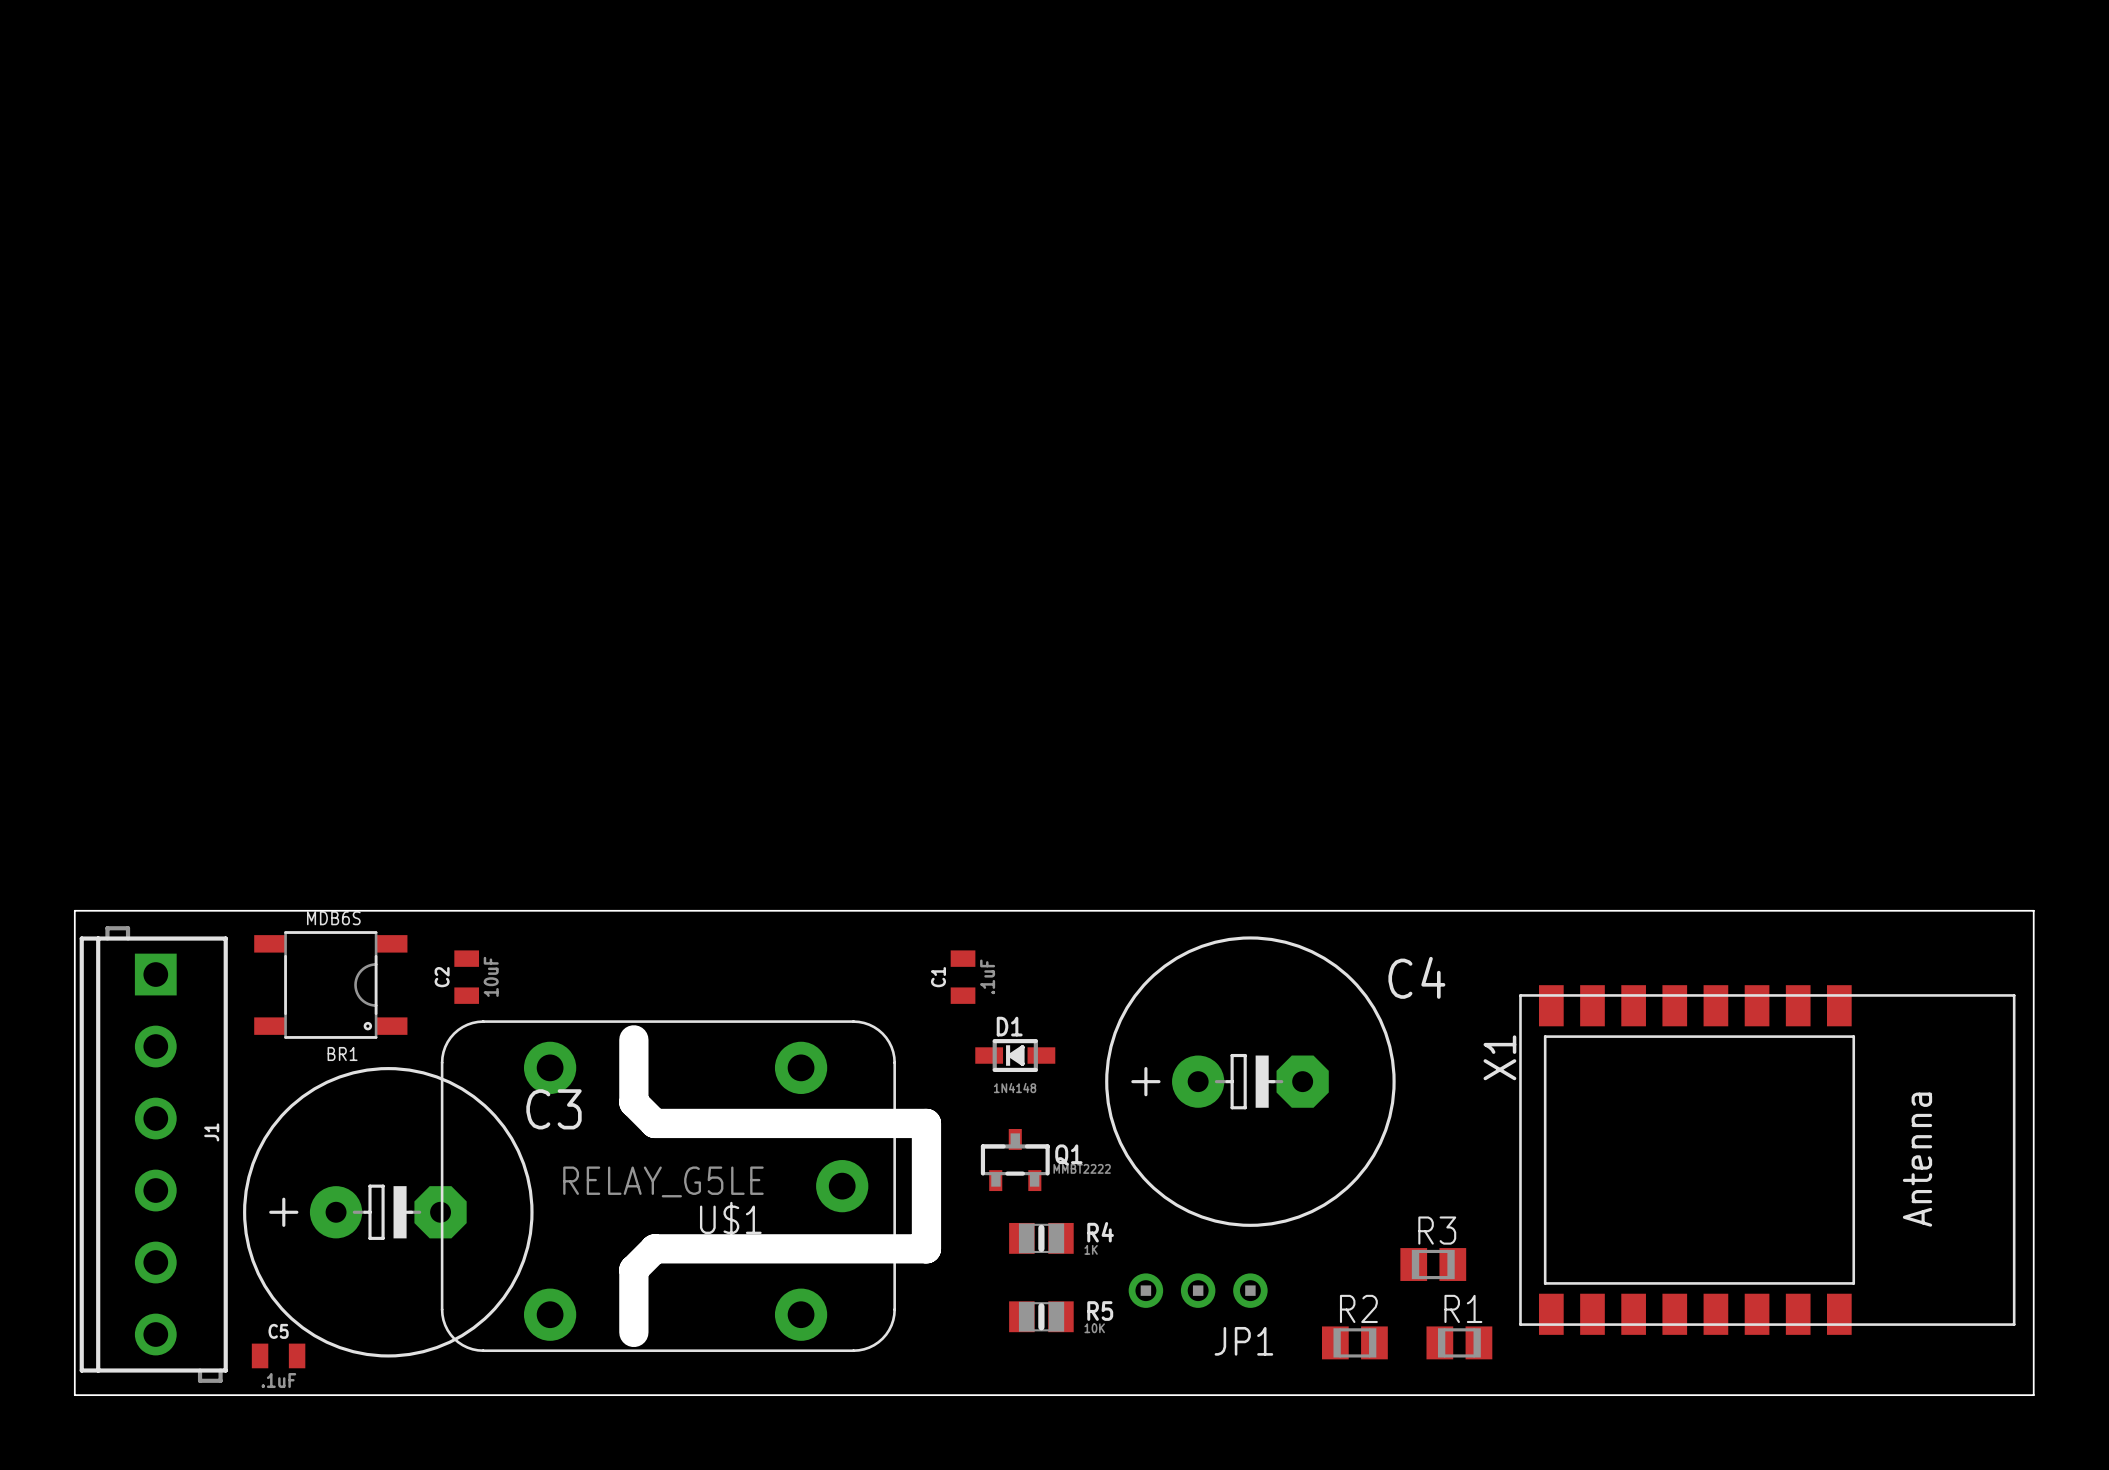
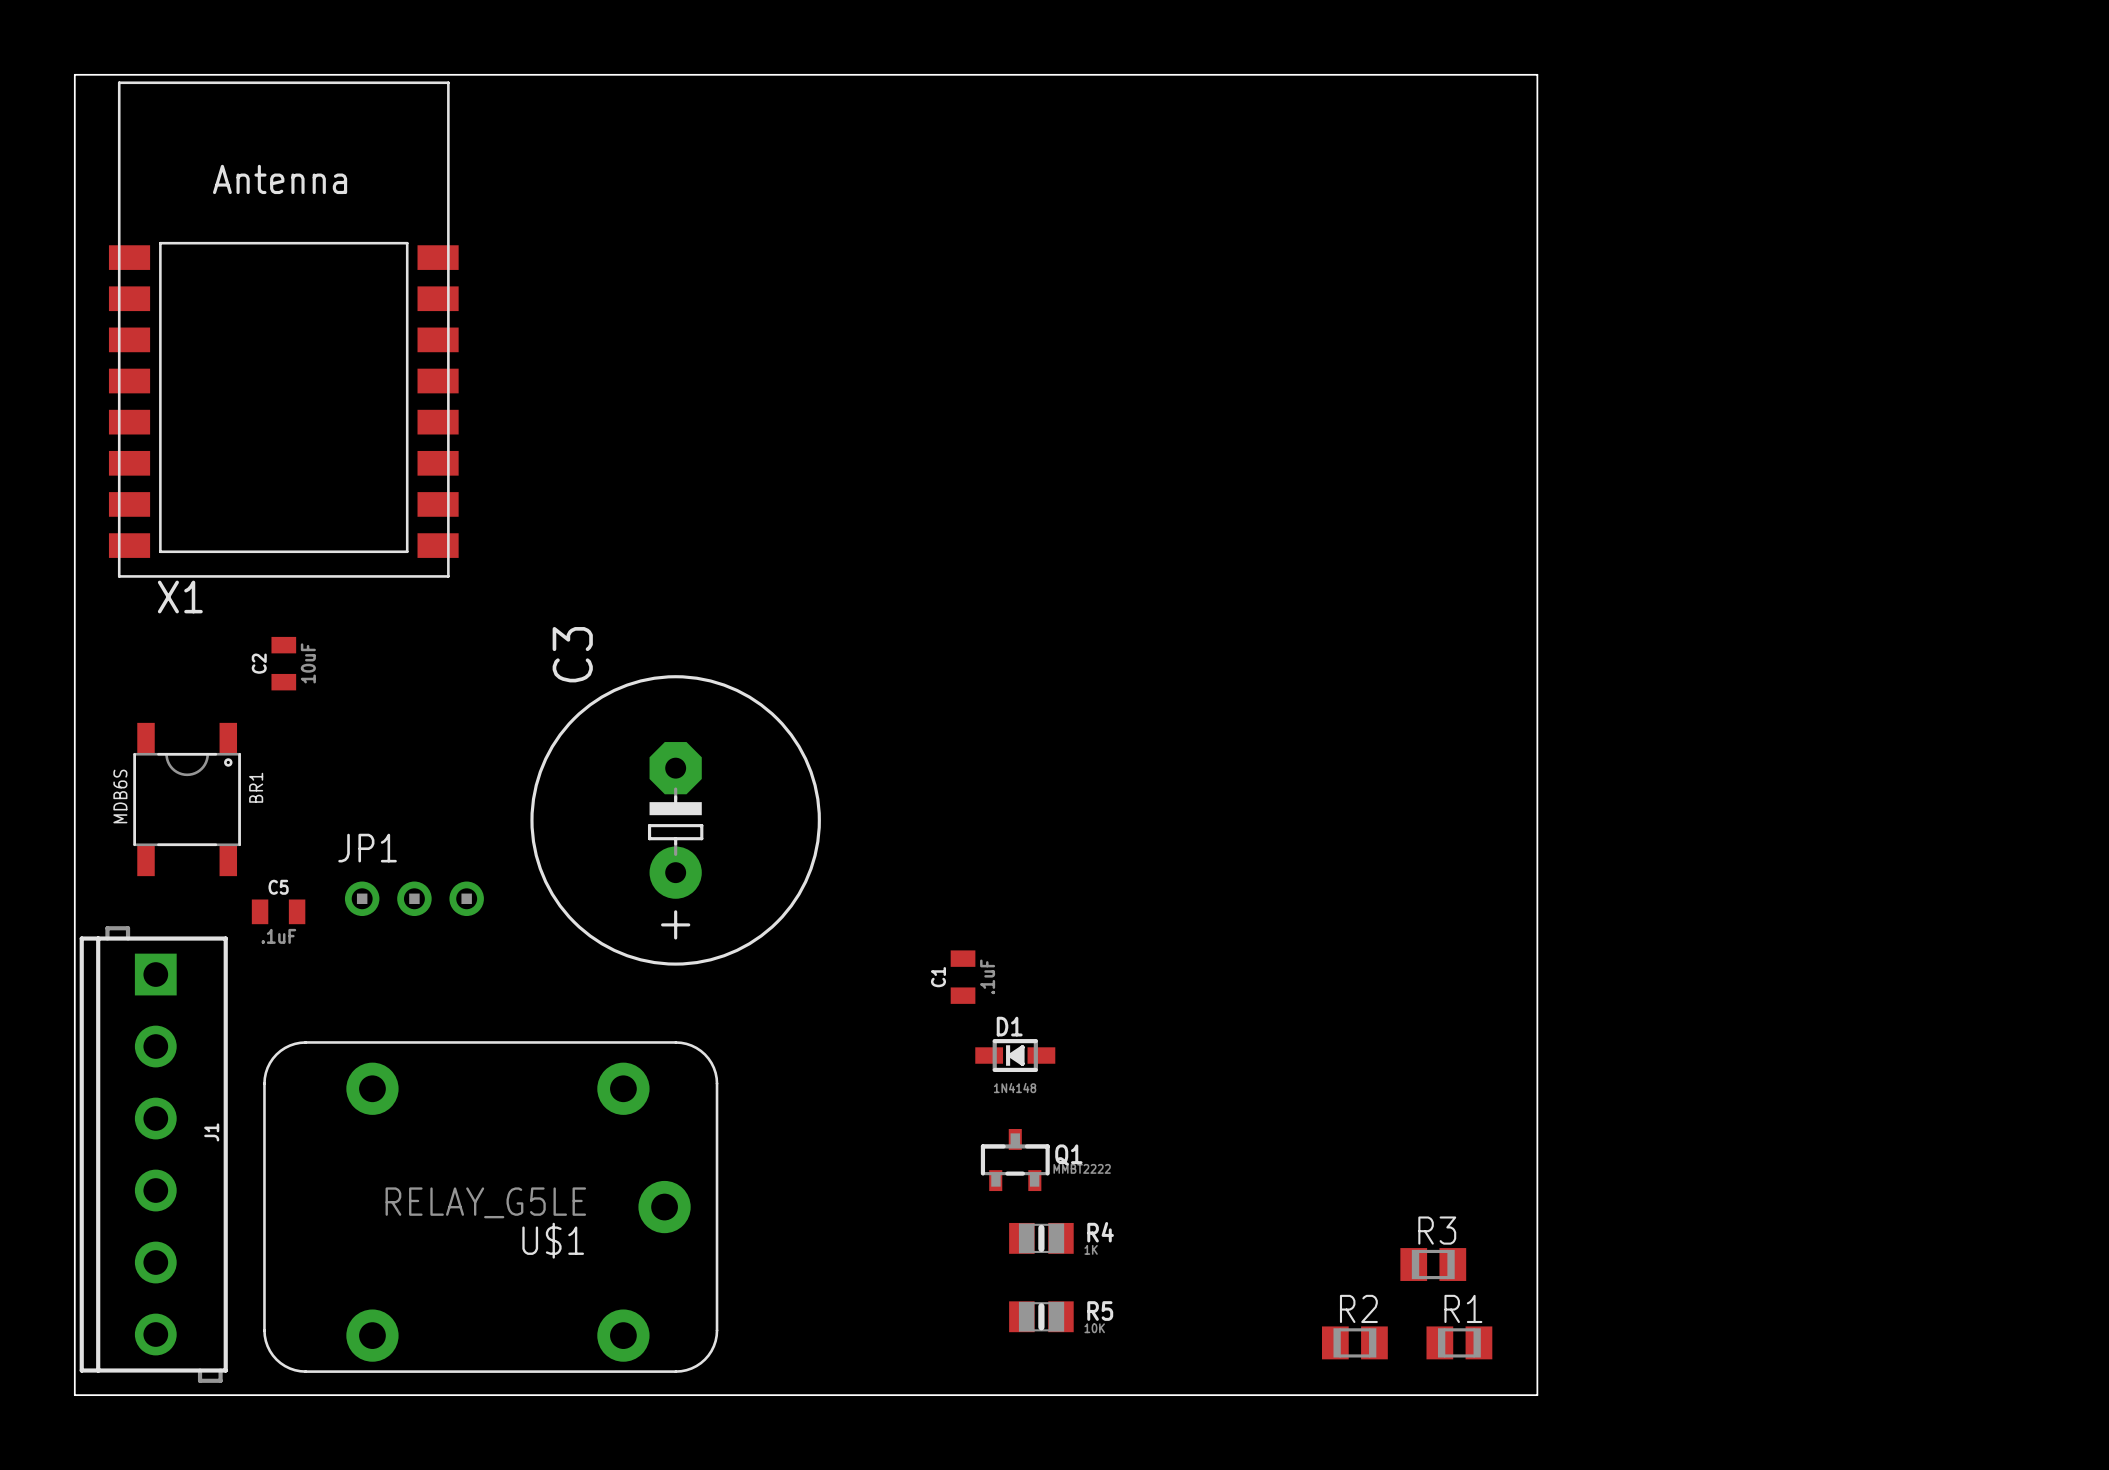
board edge: (74, 910) (2033, 910) (2033, 1395) (1537, 1395) -> (74, 910) (74, 74) (1537, 74) (1537, 1395)
C2 position: (466, 977) -> (283, 663)
BR1 rotation: 0° (330, 984) -> 90° counterclockwise (187, 799)
BR1 position: (330, 984) -> (187, 799)
X1 footprint: [1519, 985, 2016, 1335] -> [108, 81, 459, 578]
board edge: (633, 1039) (633, 1102) (654, 1123) (926, 1123) (926, 1248) (654, 1248) (633, 1269) (633, 1332) -> none
X1 name position: X1 (1499, 1057) -> X1 (180, 597)
C4: (1250, 1081) -> none
U$1 position: (668, 1186) -> (490, 1207)
C3 rotation: 0° (388, 1212) -> 90° counterclockwise (675, 820)
C3 position: (388, 1212) -> (675, 820)
JP1 position: (1198, 1290) -> (414, 898)
JP1 name position: JP1 (1243, 1341) -> JP1 (367, 848)
C5 position: (278, 1355) -> (278, 911)

